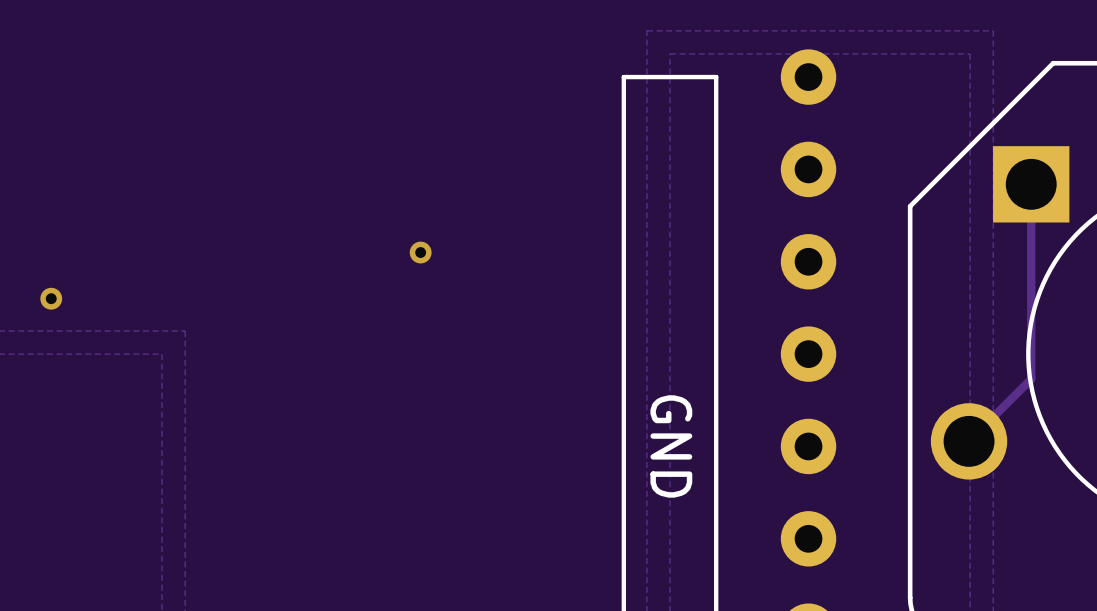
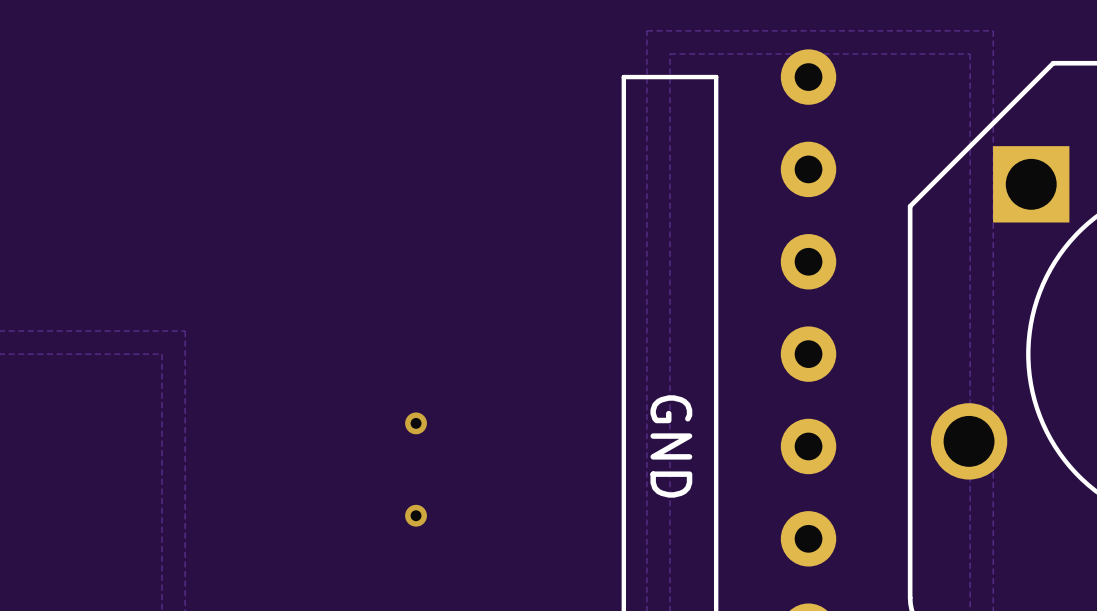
track: (1031, 184) (1031, 379) (969, 441) -> none
via: (420, 252) -> none
via: (51, 298) -> none
via: none -> (416, 423)
via: none -> (416, 515)

